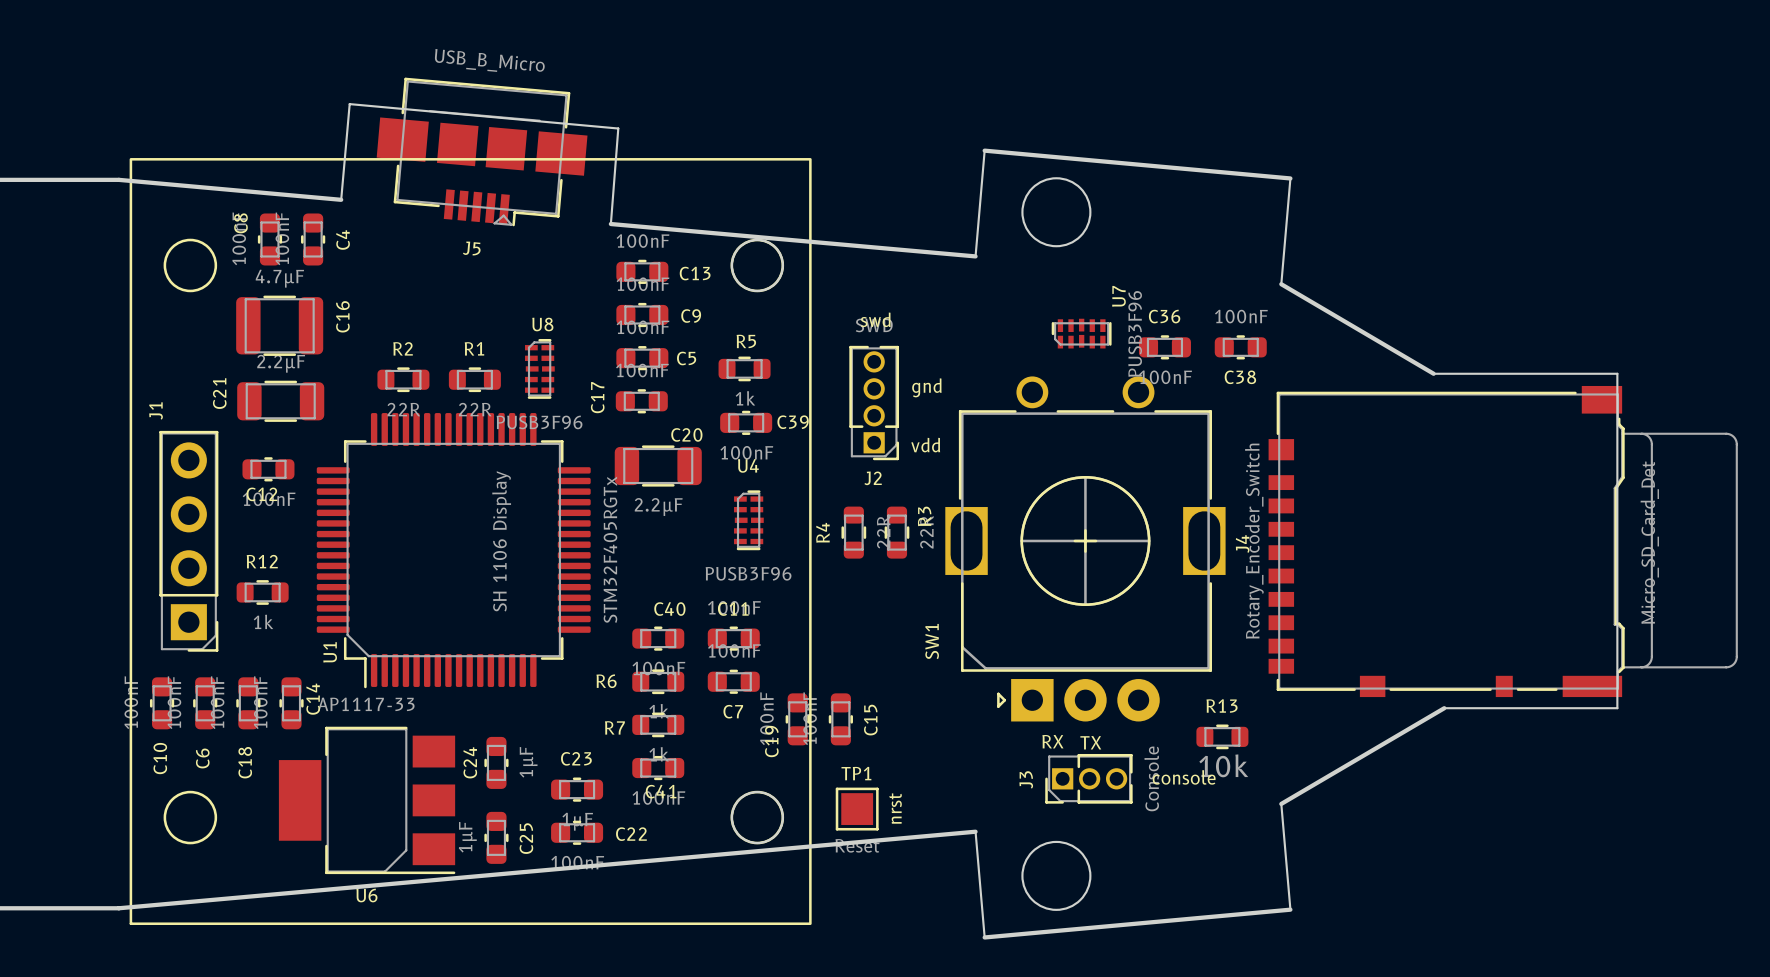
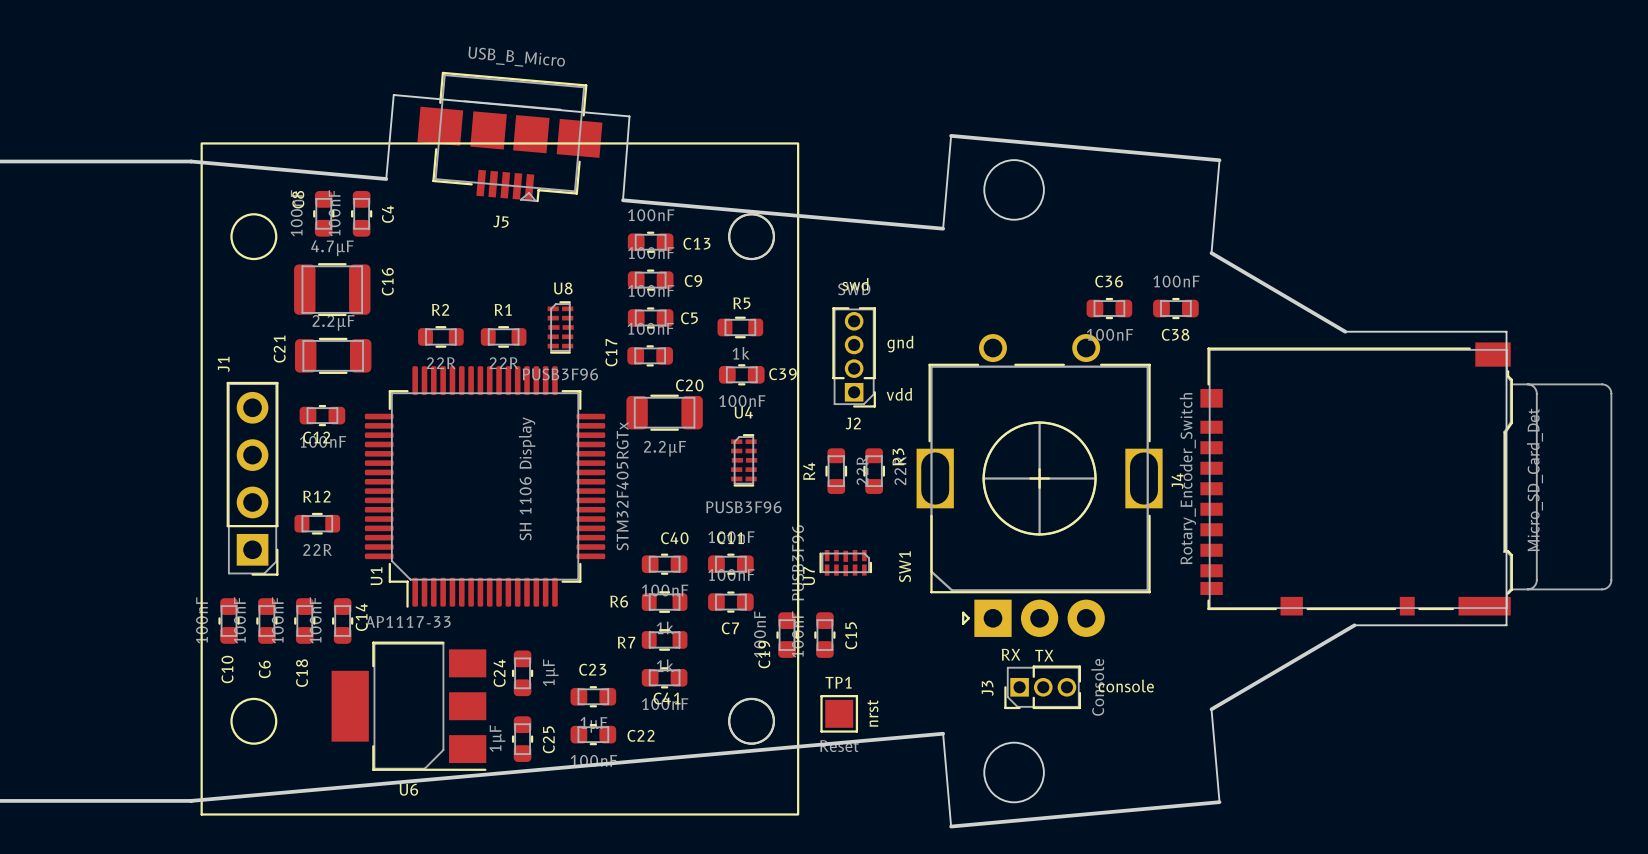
U7 rotation: 0° (1081, 333) -> 180° (845, 563)
U7 position: (1081, 333) -> (845, 563)
R12 value: 1k (263, 621) -> 22R (317, 549)
R13: 10k (1222, 736) -> none

